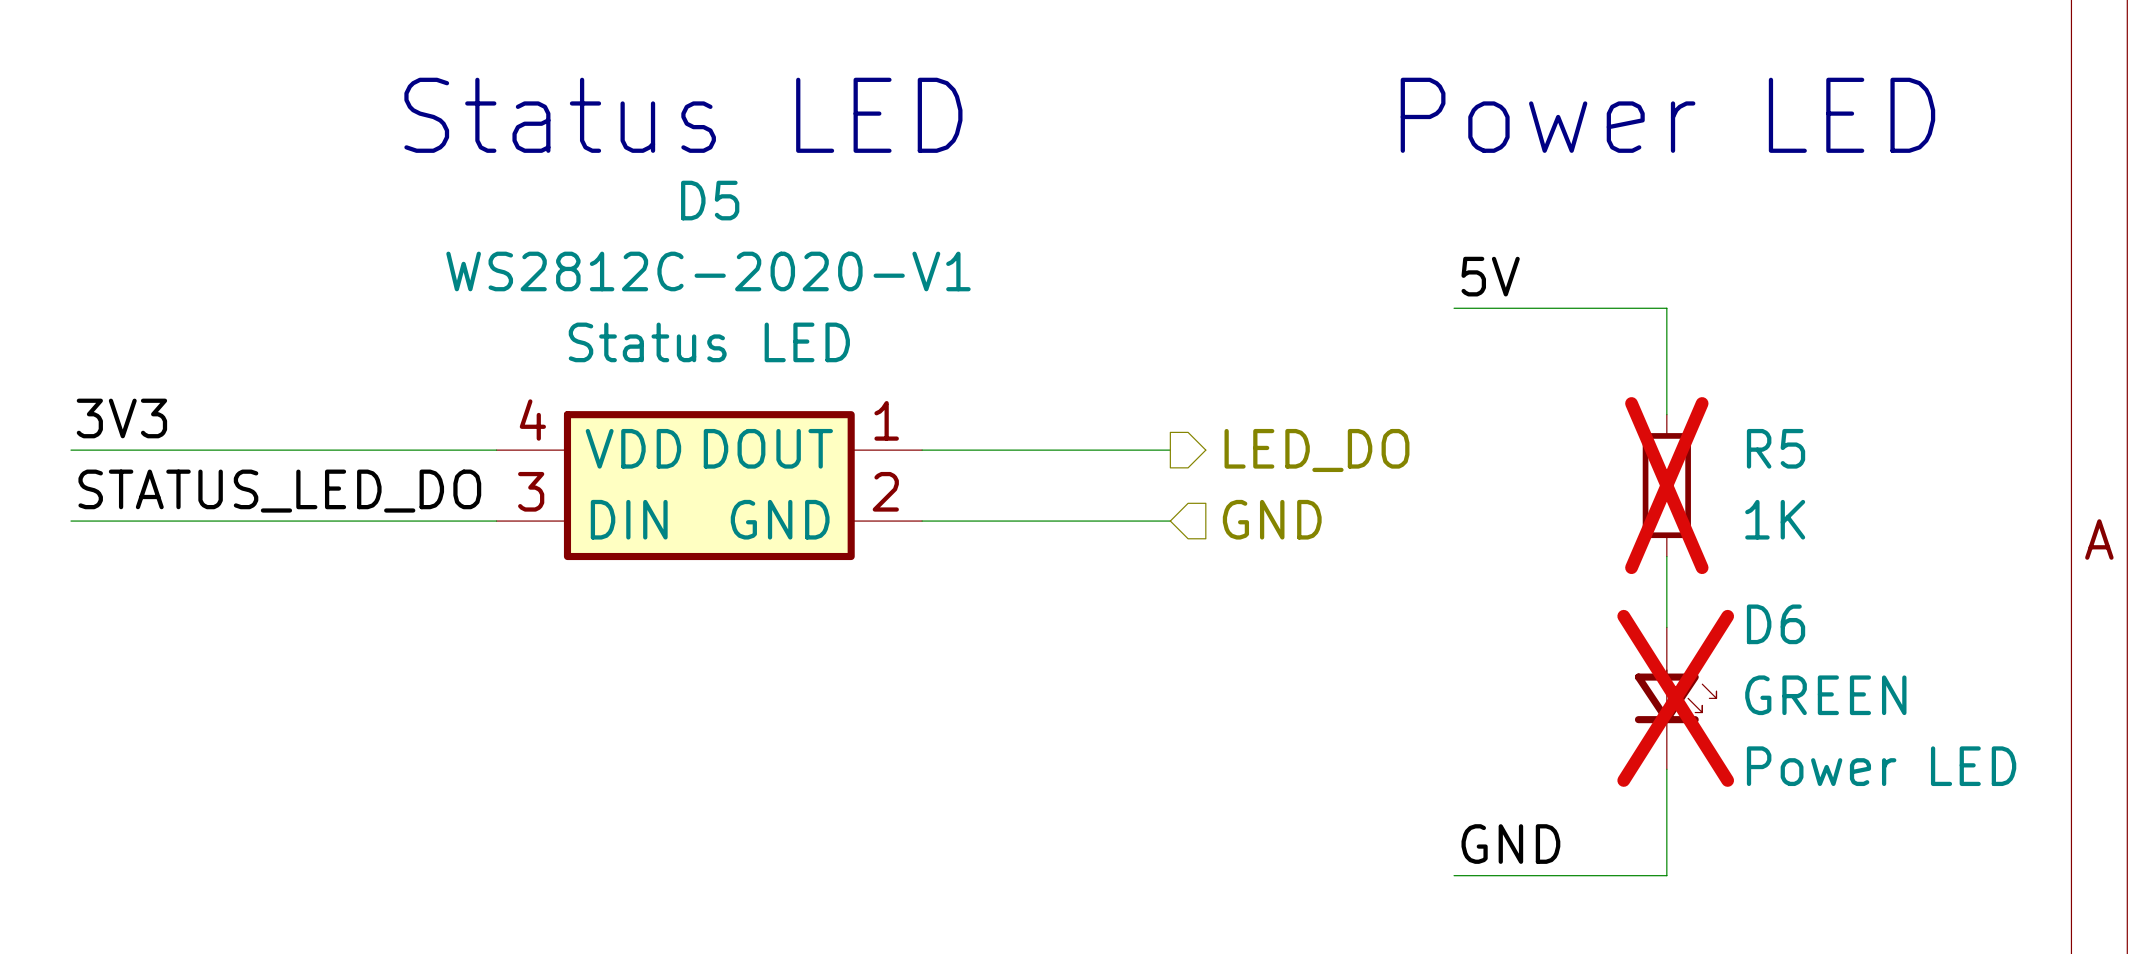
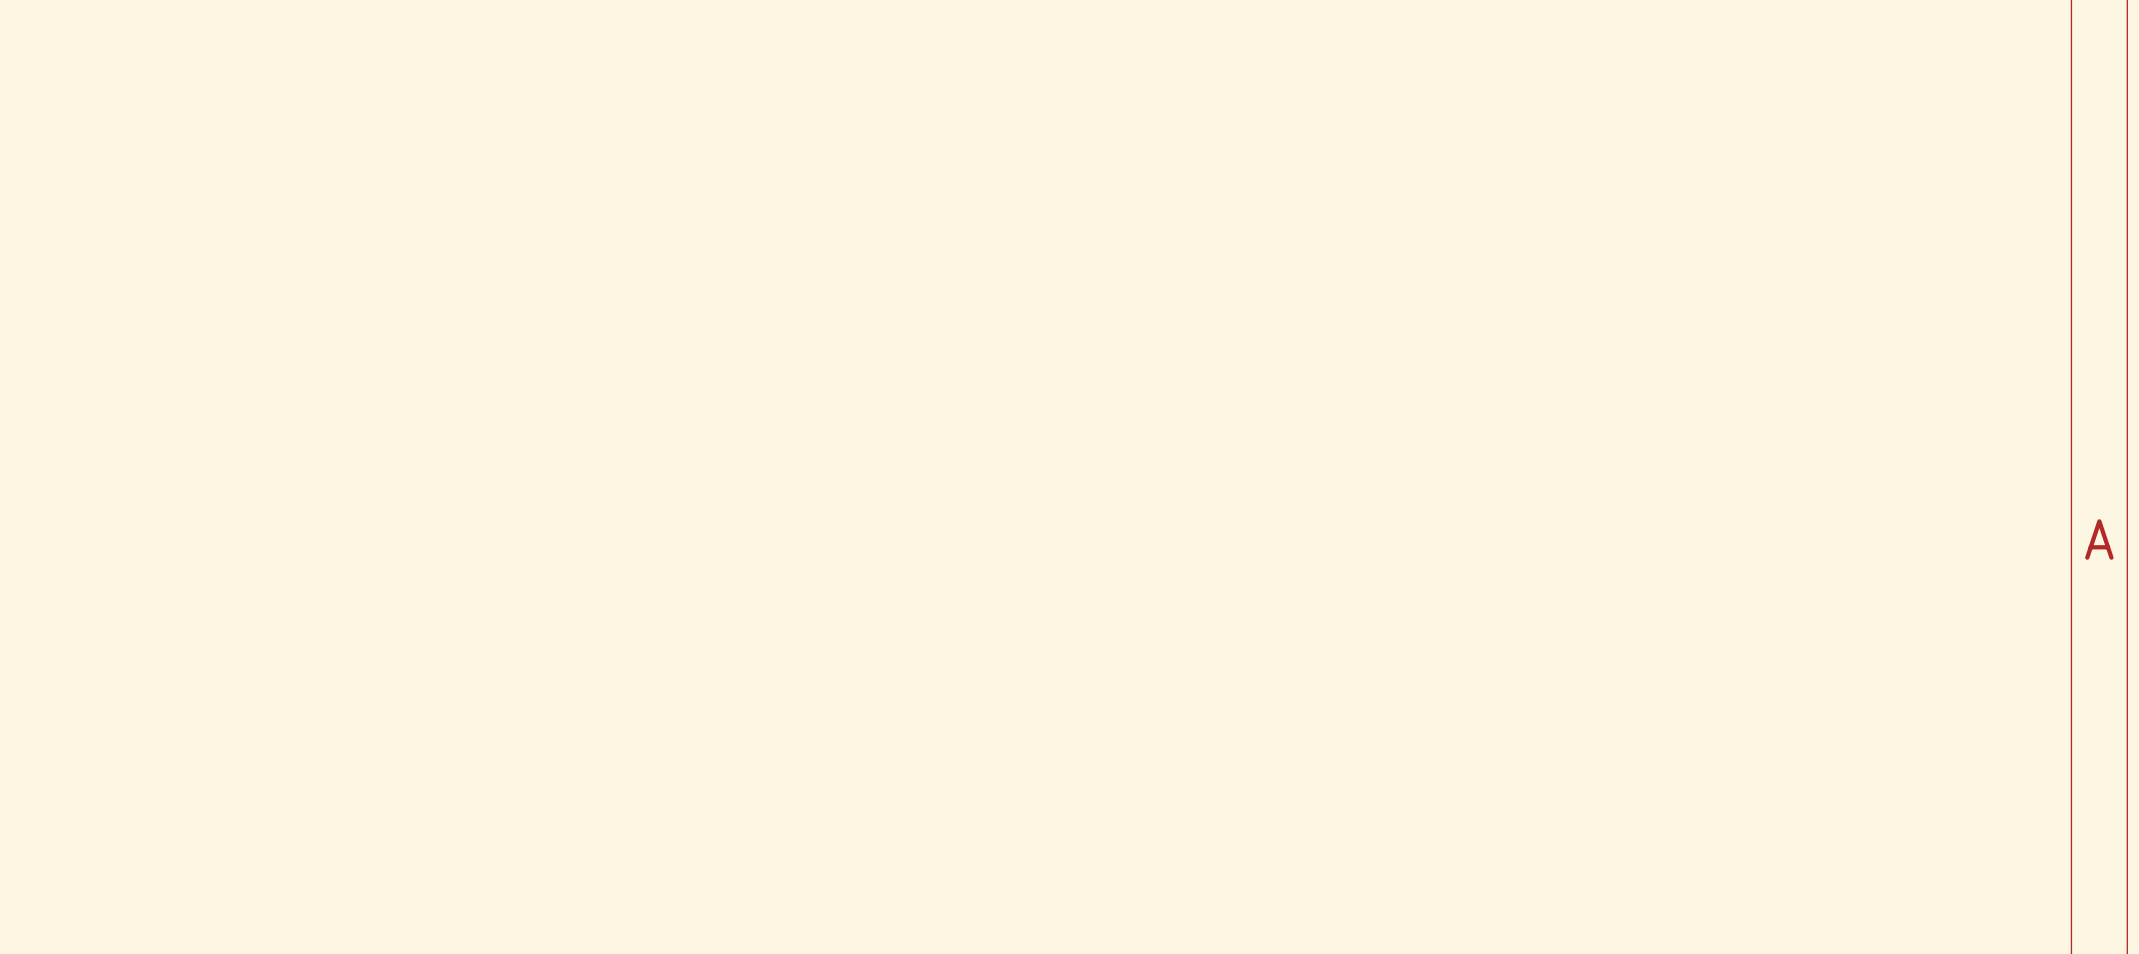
text: Status LED (683, 115) -> none
text: Power LED (1667, 115) -> none
label: 5V (1490, 276) -> none
wire: (1454, 308) (1666, 308) (1666, 414) -> none
label: 3V3 (121, 418) -> none
wire: (71, 450) (496, 450) -> none
wire: (922, 450) (1170, 450) -> none
hierarchical label: LED_DO (1316, 450) -> none
D5: WS2812C-2020-V1 (709, 485) -> none
R5: 1K (1666, 485) -> none
label: STATUS_LED_DO (279, 491) -> none
hierarchical label: GND (1272, 519) -> none
wire: (71, 521) (496, 521) -> none
wire: (922, 521) (1170, 521) -> none
wire: (1666, 556) (1666, 627) -> none
D6: GREEN (1675, 698) -> none
wire: (1666, 769) (1666, 875) (1454, 875) -> none
label: GND (1510, 844) -> none

